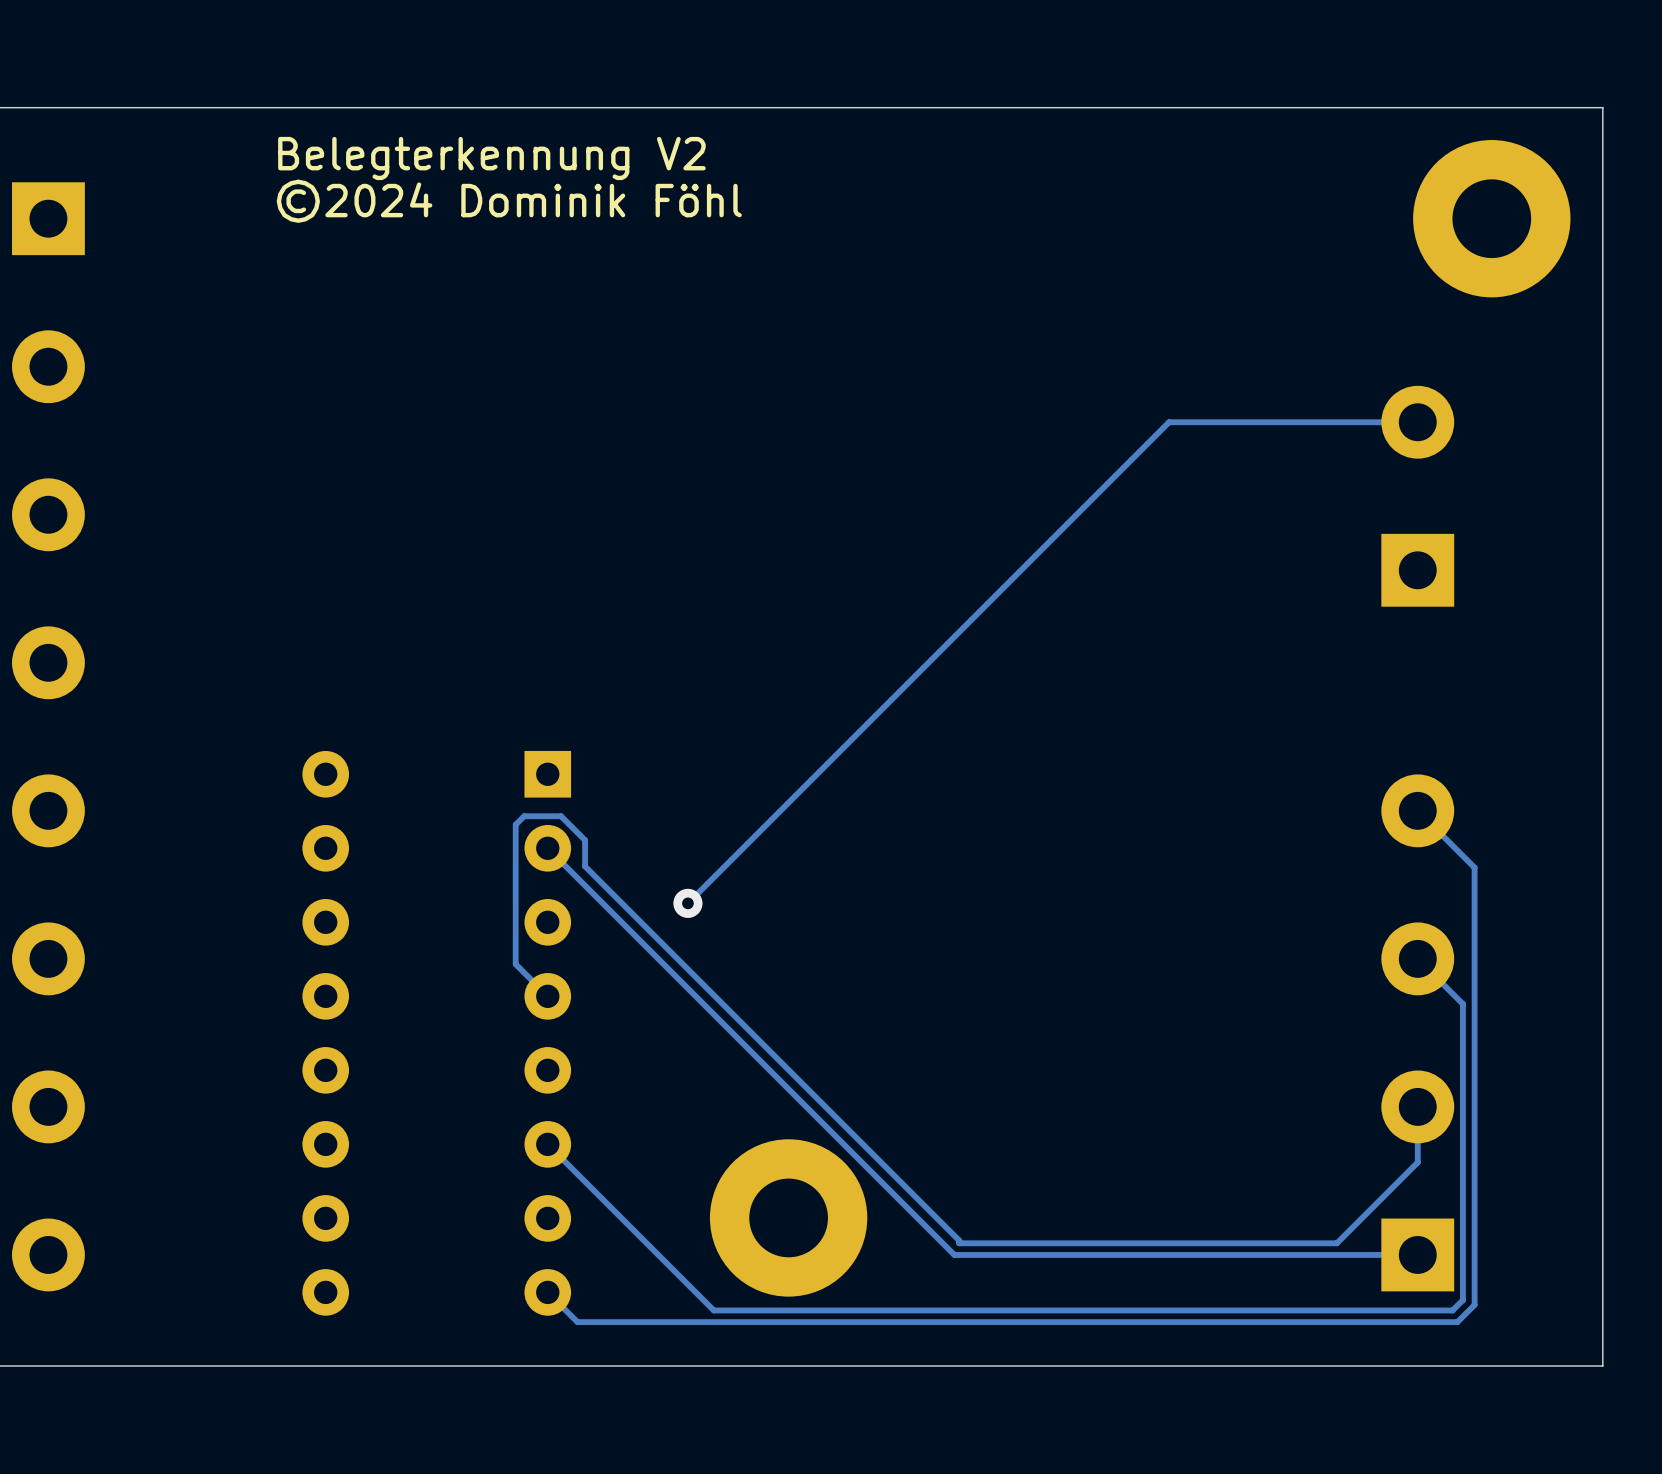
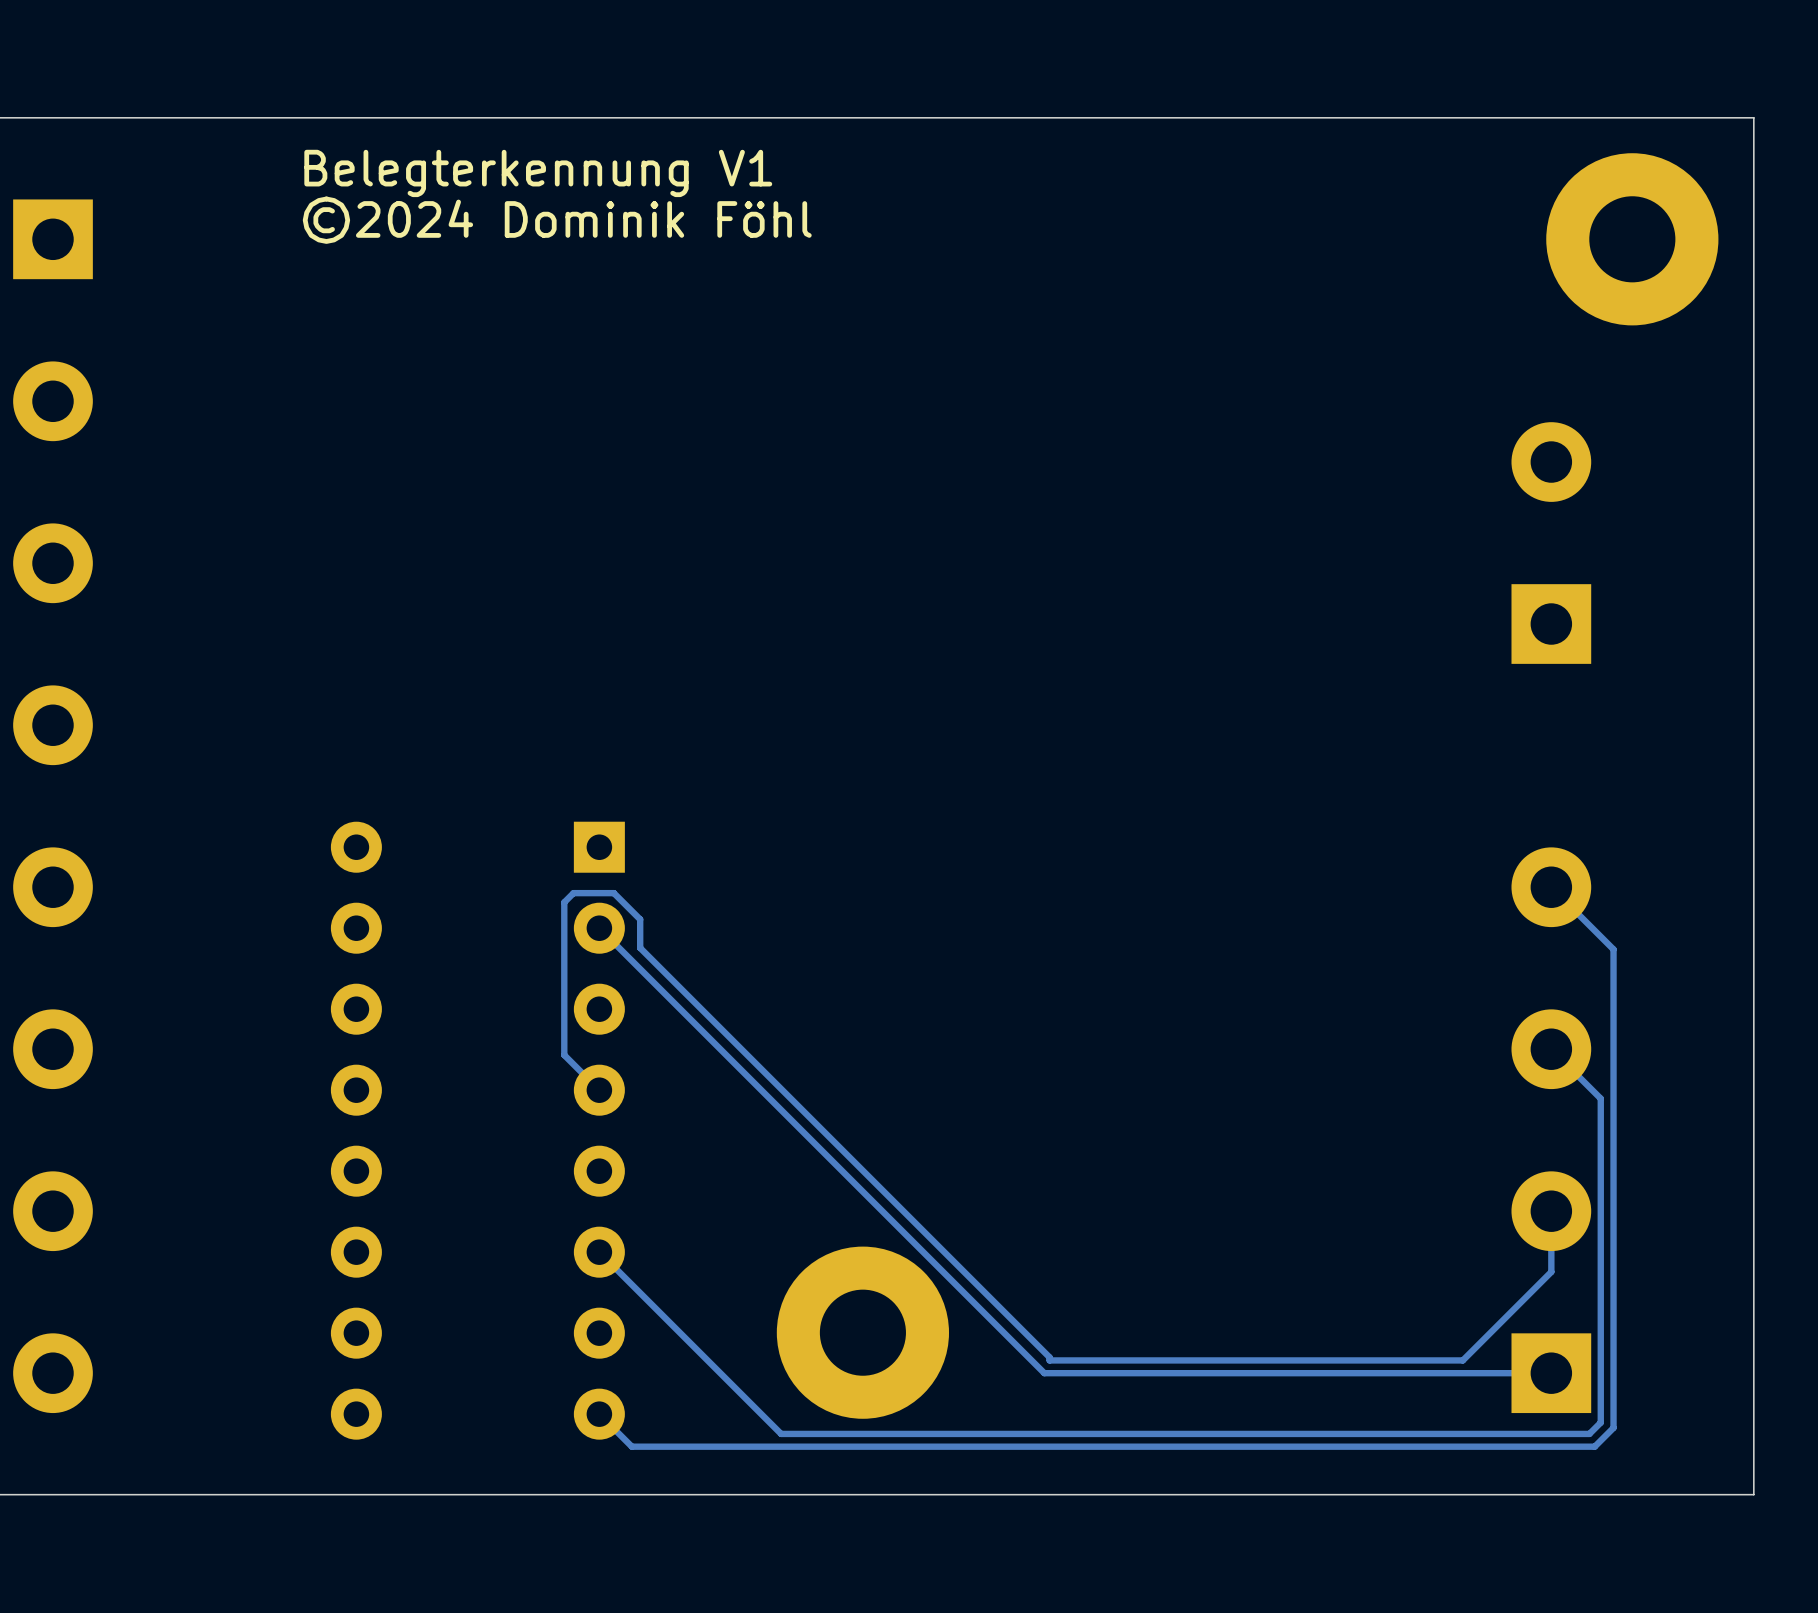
text: Belegterkennung V2 (491, 158) -> Belegterkennung V1 (538, 173)
track: (1417, 422) (1169, 422) (687, 903) -> none
via: (687, 903) -> none

